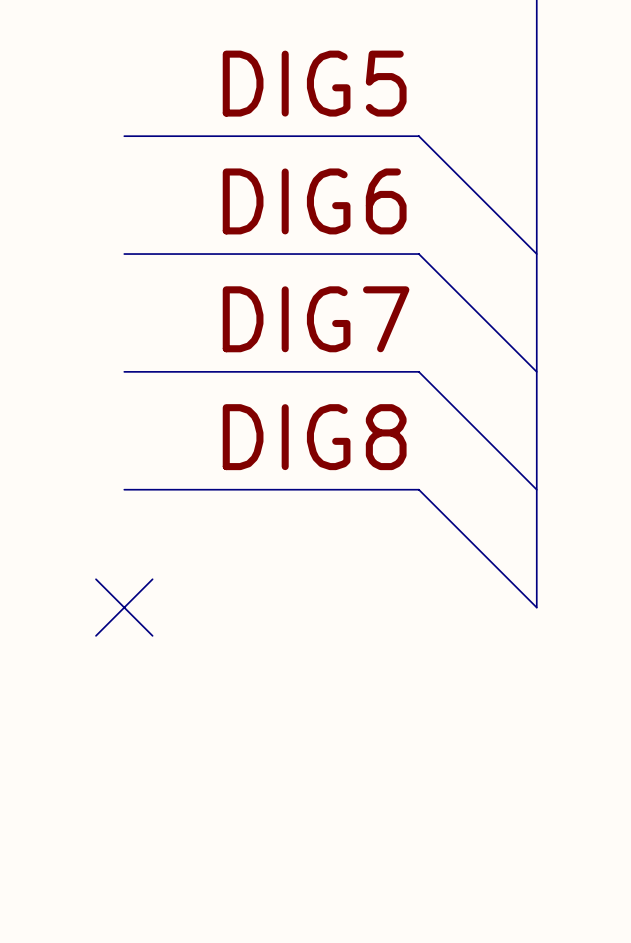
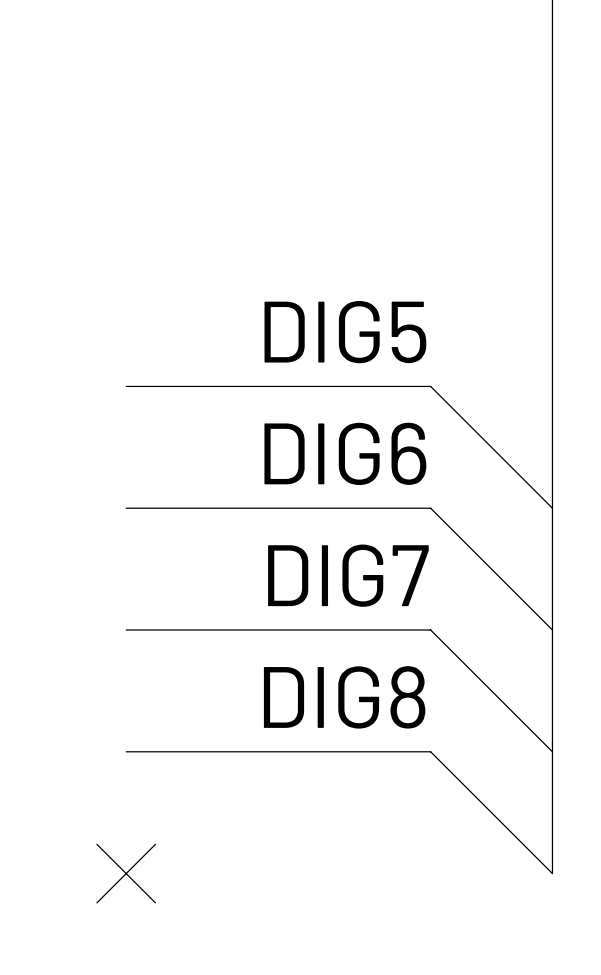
label: DIG5 (314, 83) -> none
wire: (124, 136) (418, 136) (536, 254) -> (126, 630) (430, 630) (552, 751)
label: DIG6 (314, 201) -> none
wire: (124, 254) (418, 254) (536, 371) -> (126, 751) (430, 751) (552, 873)
label: DIG7 (316, 319) -> DIG5 (345, 332)
label: DIG8 (314, 437) -> DIG6 (345, 453)
label: none -> DIG7 (348, 575)
no-connect mark position: (124, 607) -> (126, 873)
bus: none -> (552, 630) (552, 873)
label: none -> DIG8 (344, 697)

